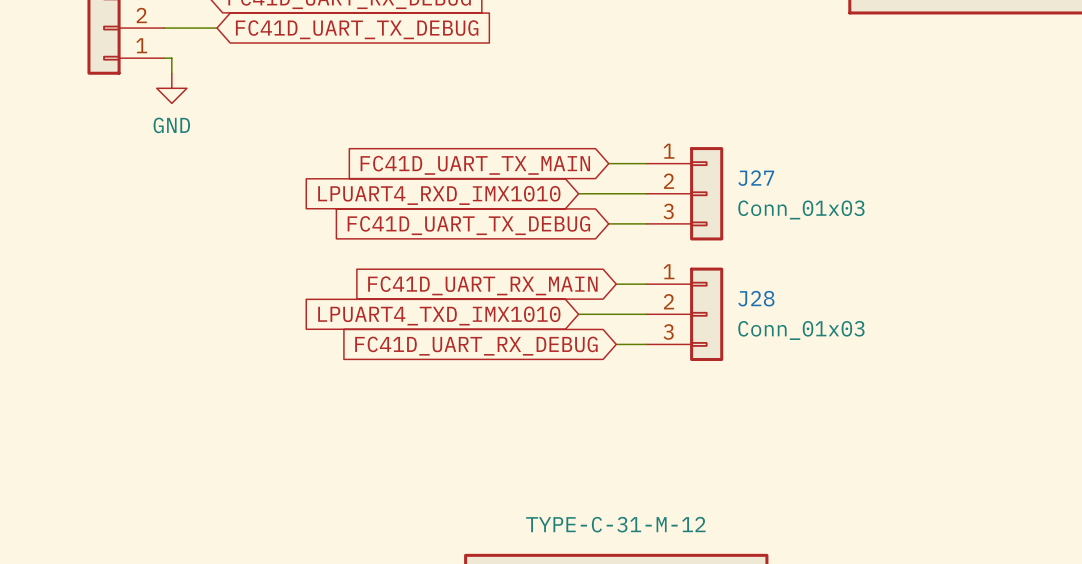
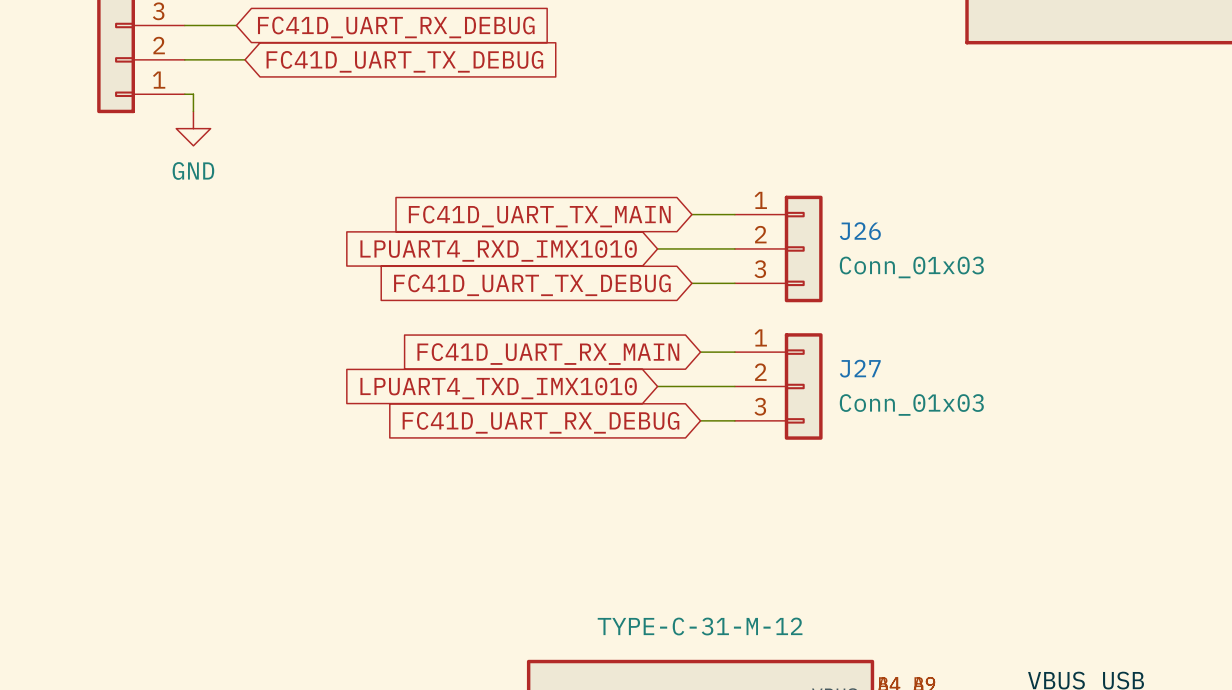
J27 name: J27 (756, 178) -> J26 (860, 231)
J28 name: J28 (756, 298) -> J27 (860, 368)

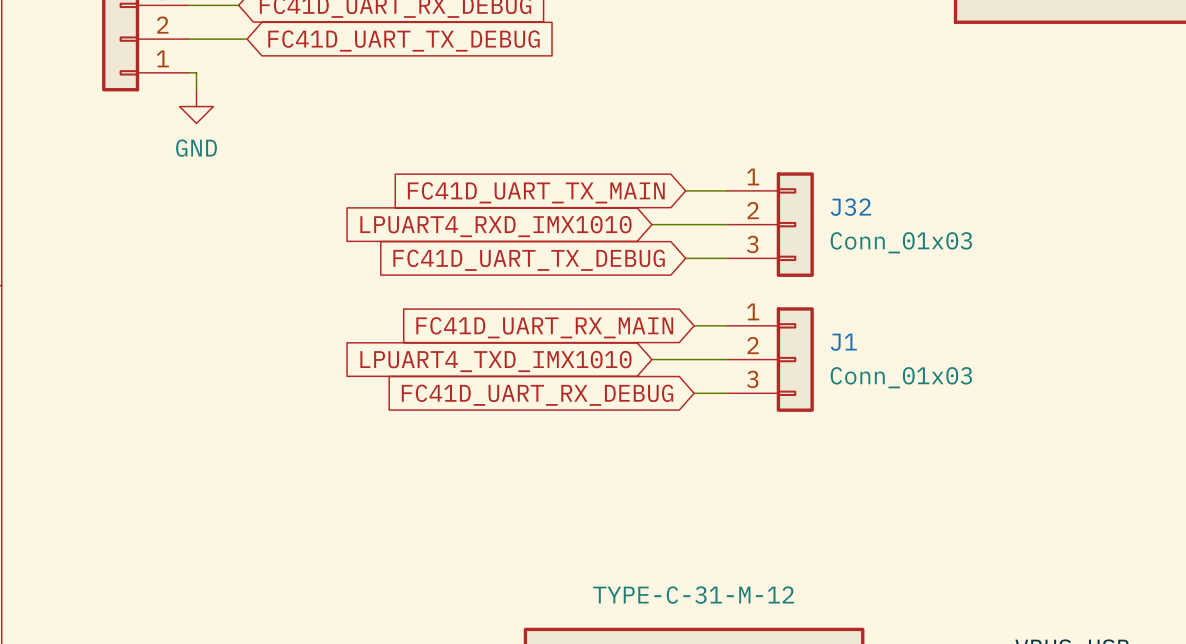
J26 name: J26 (860, 231) -> J32 (850, 207)
J27 name: J27 (860, 368) -> J1 (843, 342)

